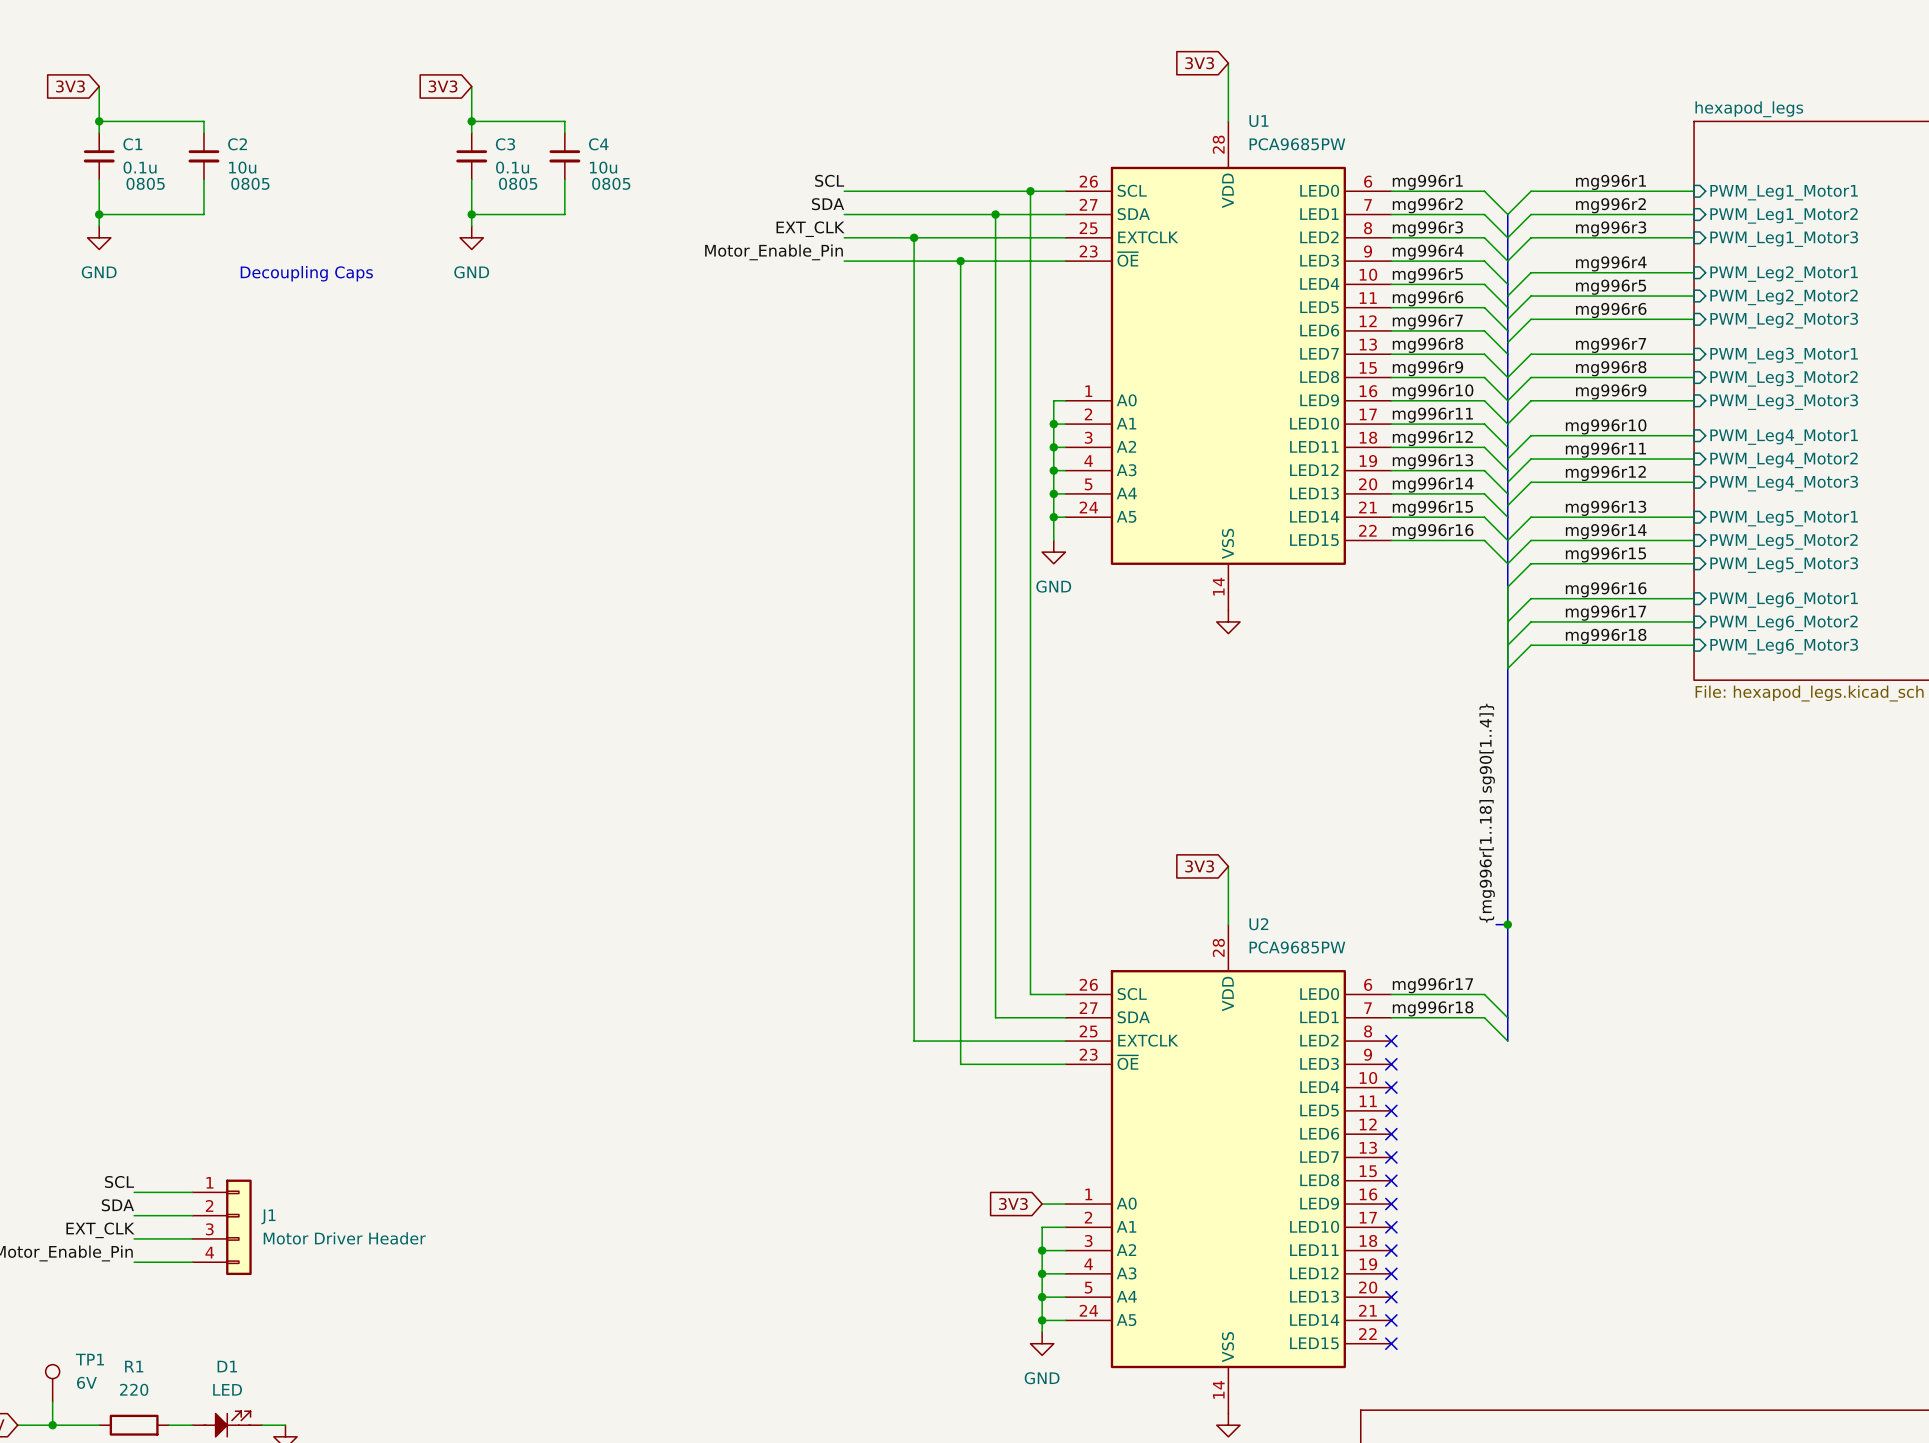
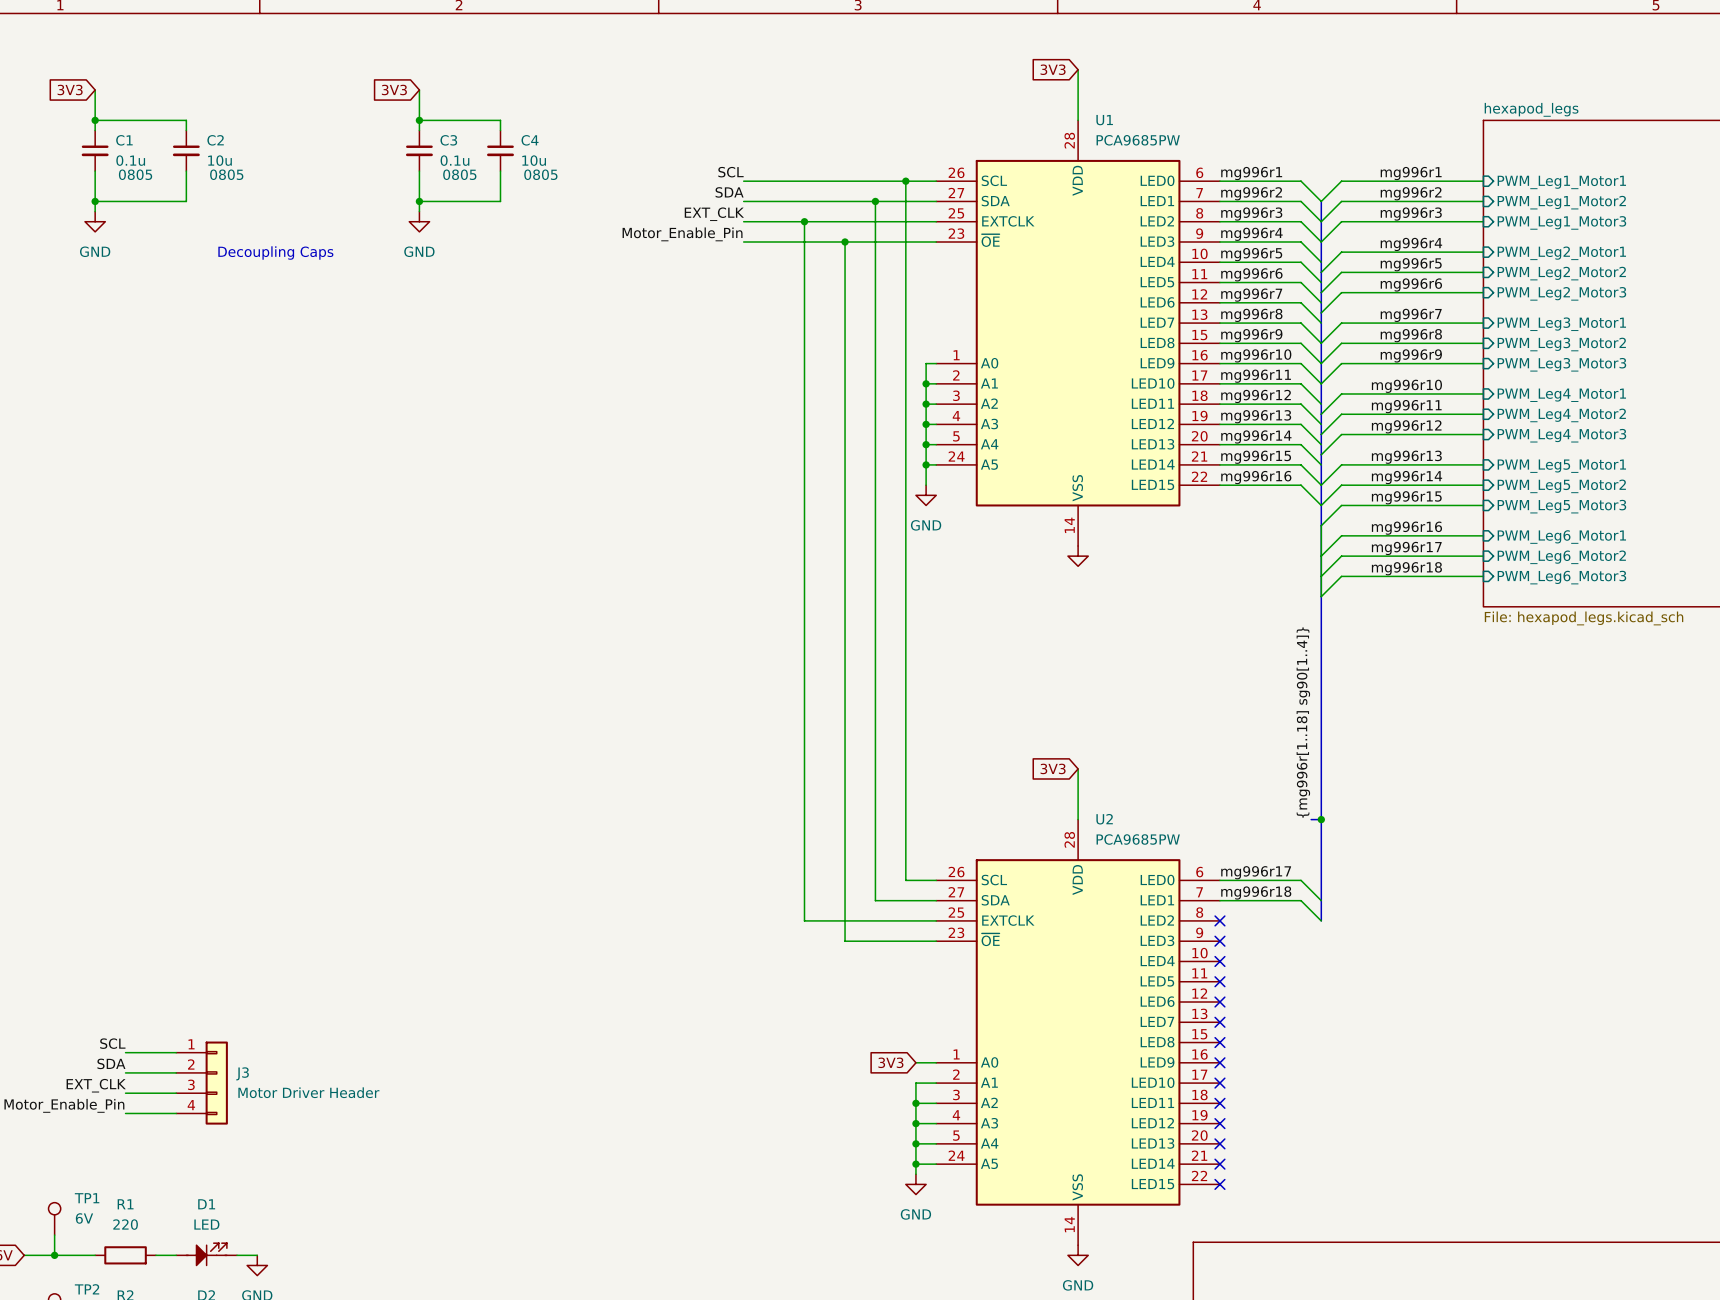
J1 name: J1 (268, 1216) -> J3 (242, 1073)

